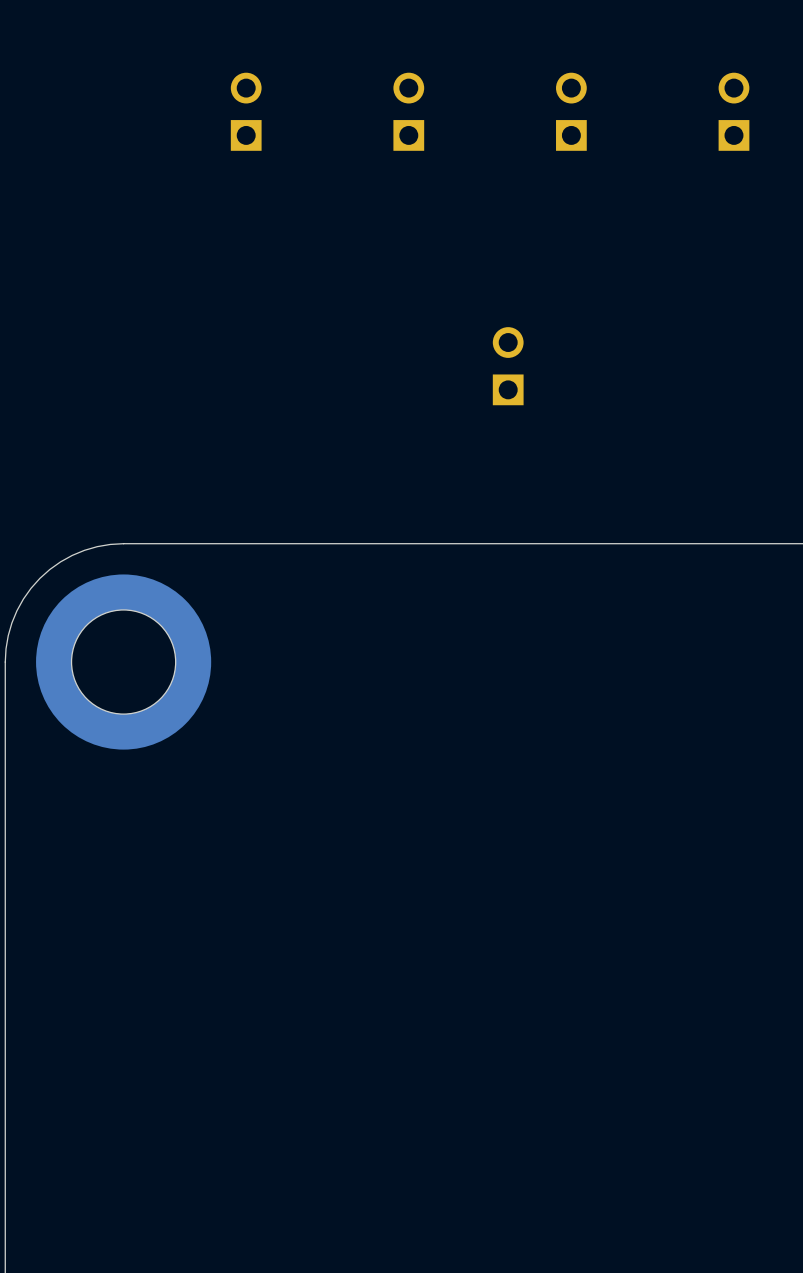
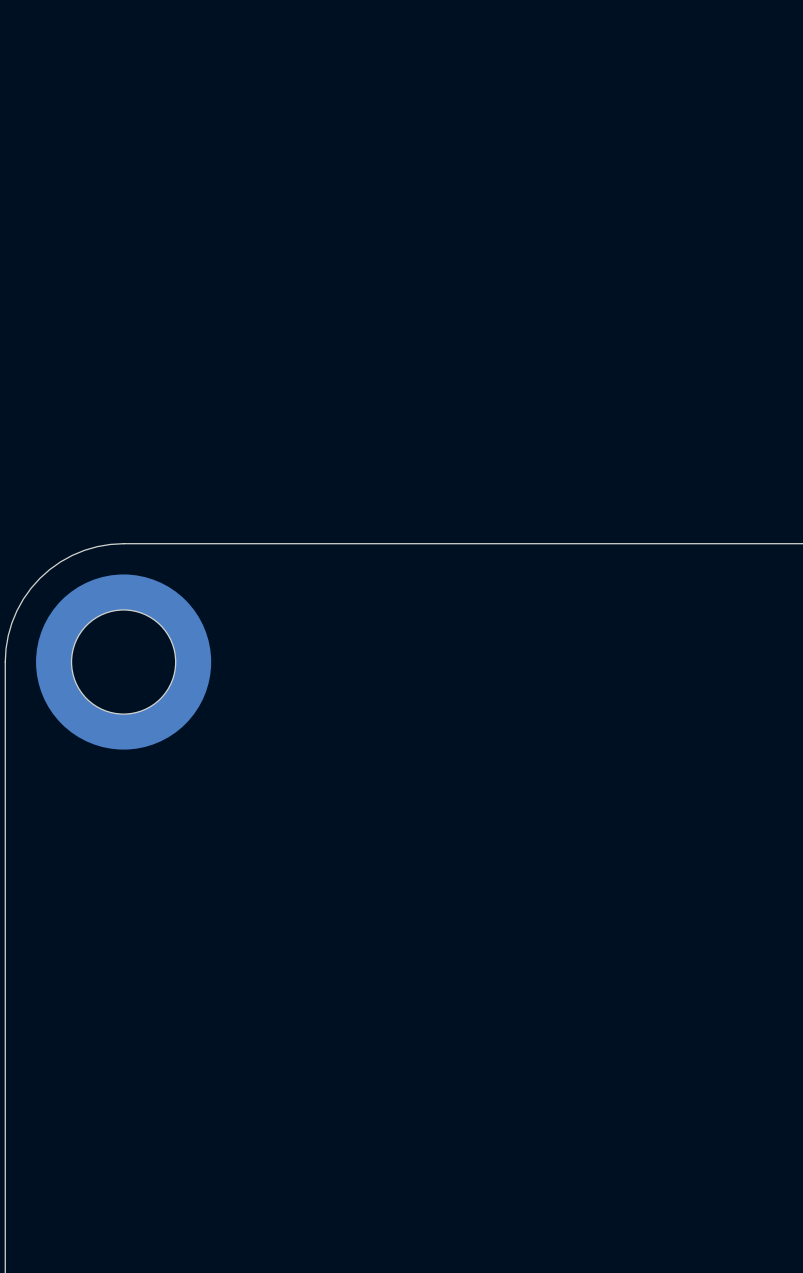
part: (246, 111) -> none
part: (408, 111) -> none
part: (571, 111) -> none
part: (733, 111) -> none
part: (508, 366) -> none

